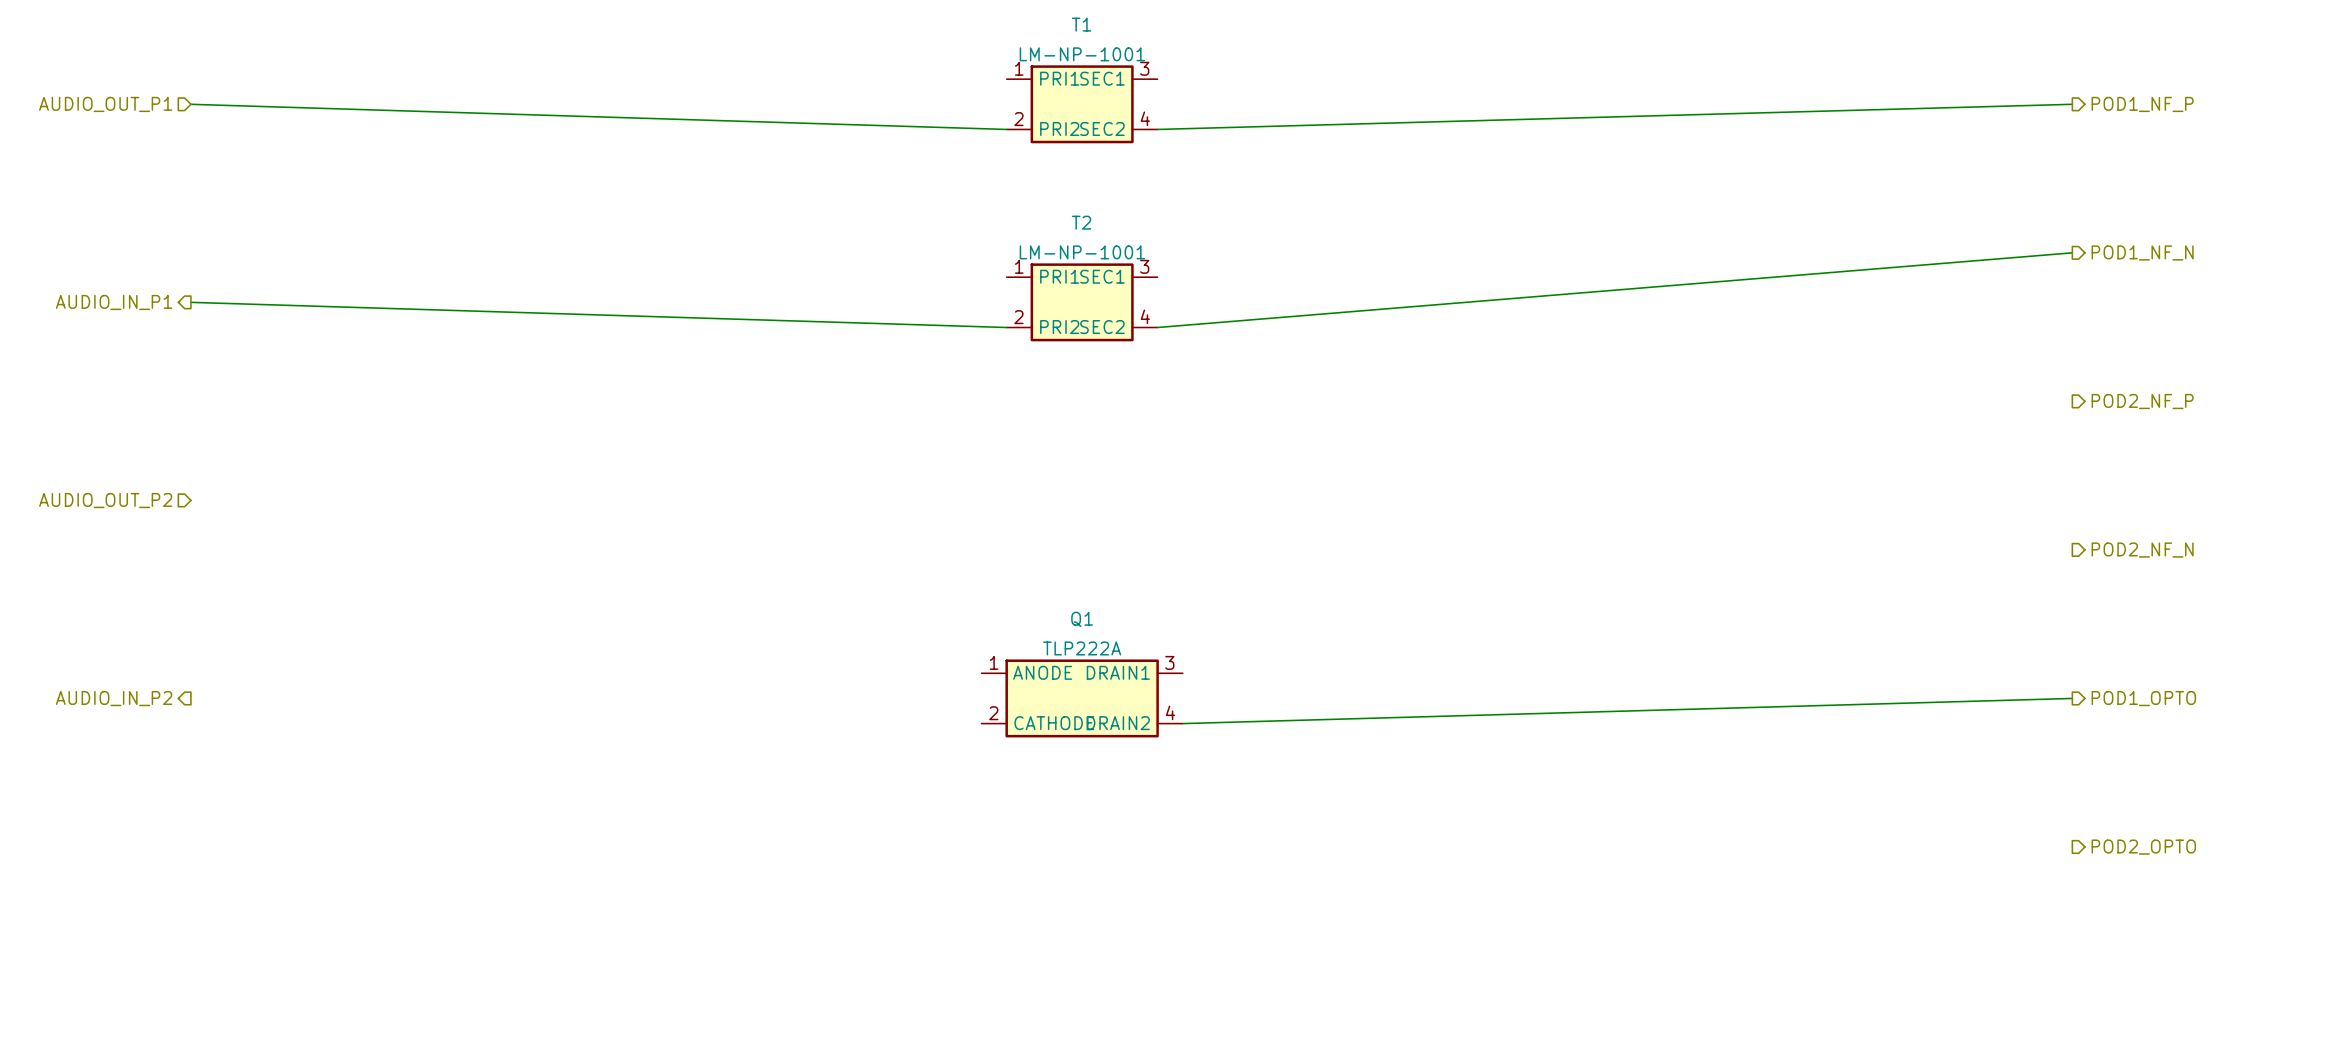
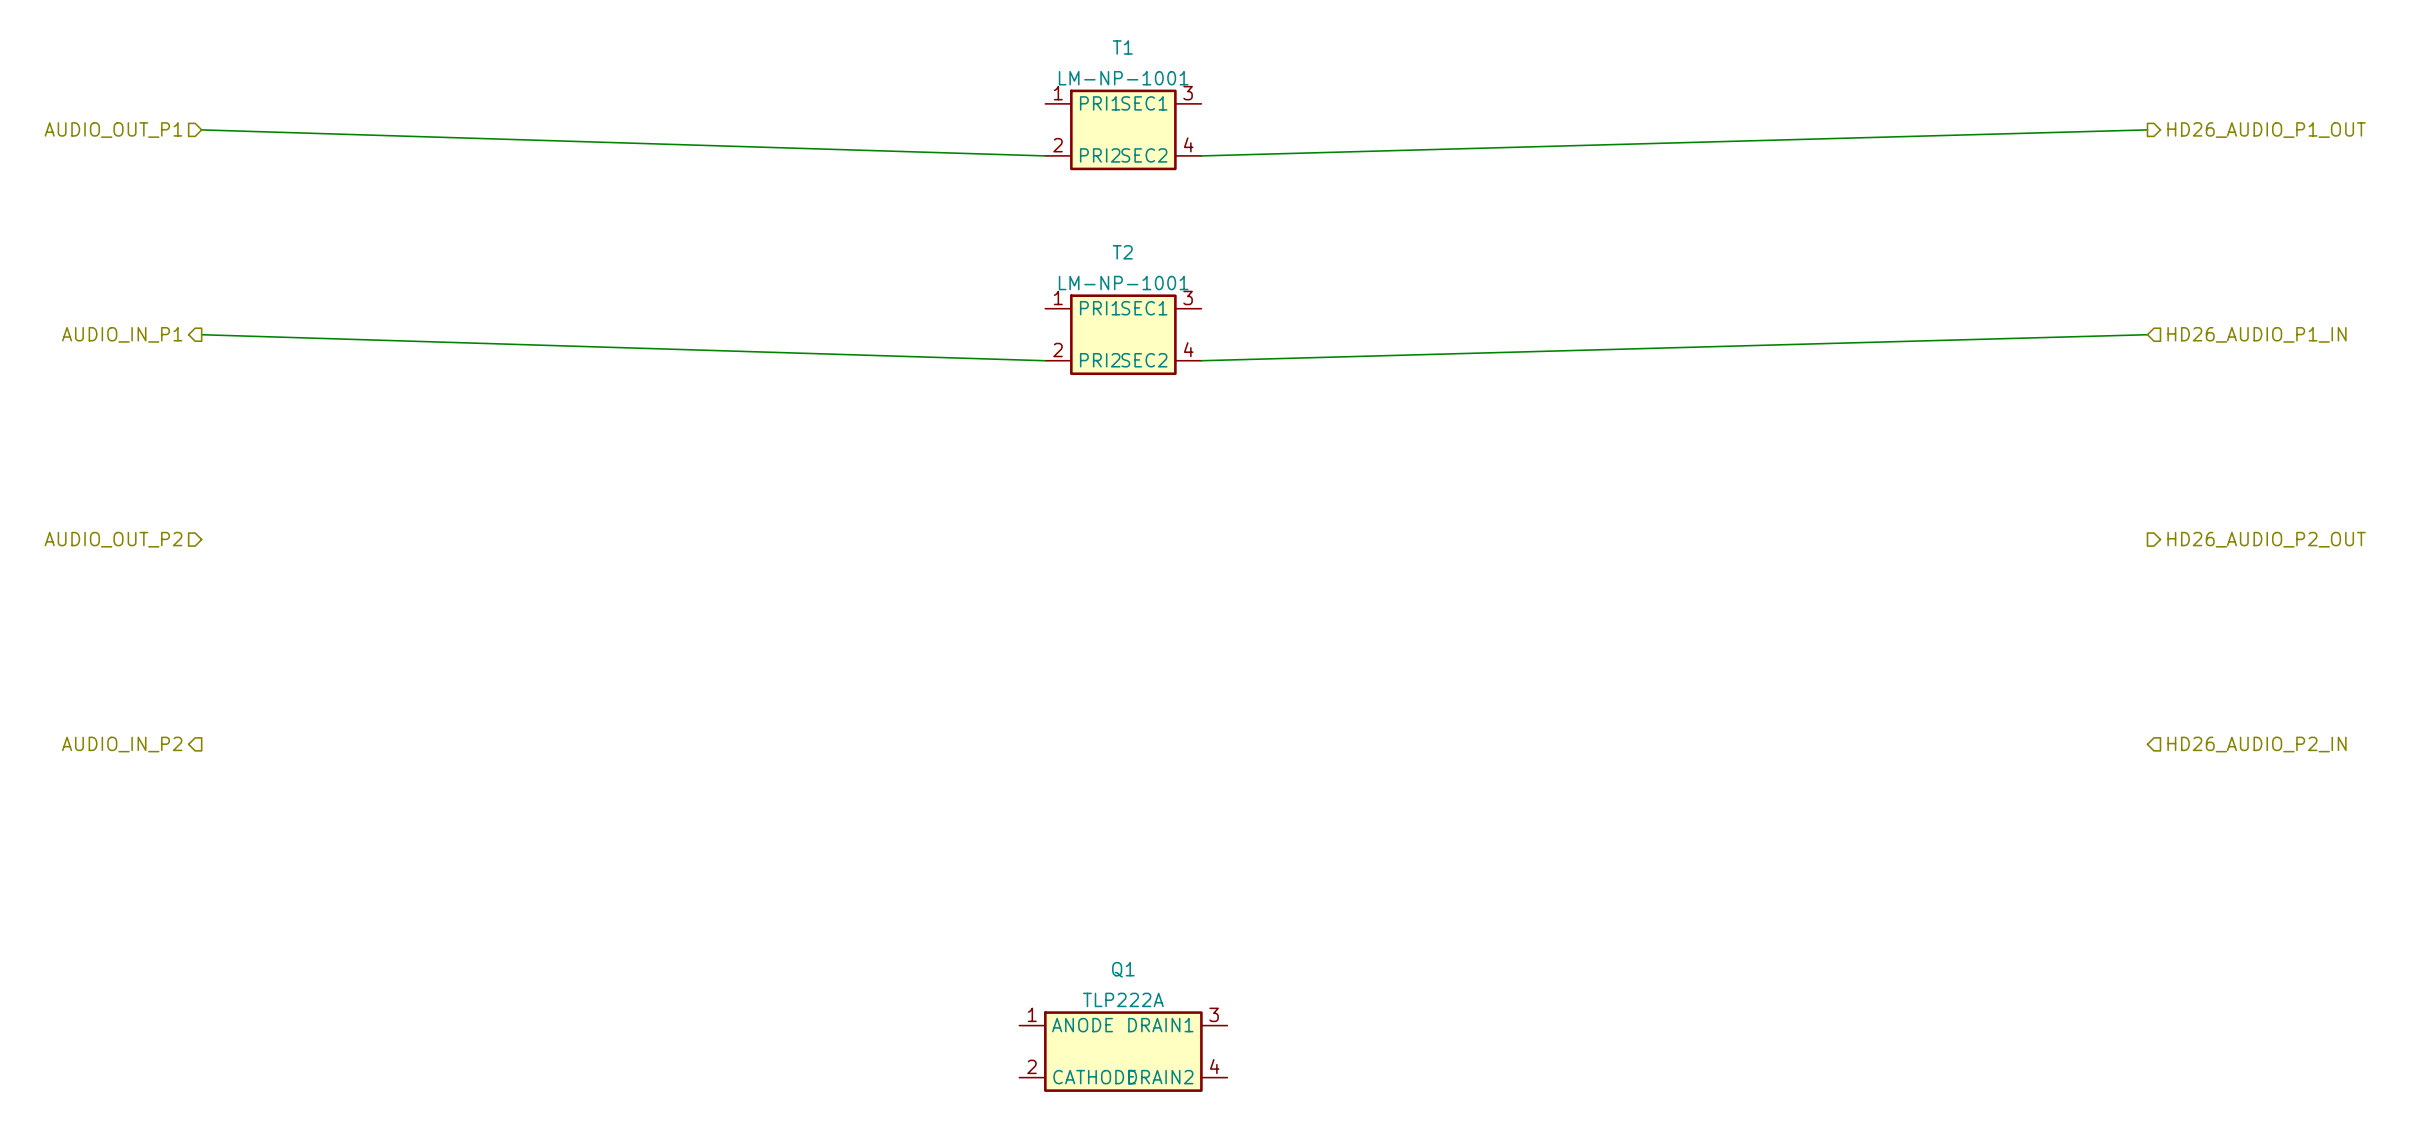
hierarchical label: POD1_NF_P (2142, 104) -> HD26_AUDIO_P1_OUT (2266, 130)
wire: (2072, 252) (1157, 327) -> (2147, 334) (1201, 360)
hierarchical label: POD1_NF_N (2142, 252) -> none
hierarchical label: none -> HD26_AUDIO_P1_IN (2257, 334)
hierarchical label: POD2_NF_P (2142, 401) -> none
hierarchical label: none -> HD26_AUDIO_P2_OUT (2266, 539)
hierarchical label: POD2_NF_N (2142, 550) -> none
Q1 position: (1082, 698) -> (1123, 1051)
wire: (2072, 698) (1182, 723) -> none
hierarchical label shape: output (2143, 698) -> input (2257, 744)
hierarchical label: POD1_OPTO (2143, 698) -> HD26_AUDIO_P2_IN (2257, 744)
hierarchical label: POD2_OPTO (2143, 847) -> none

